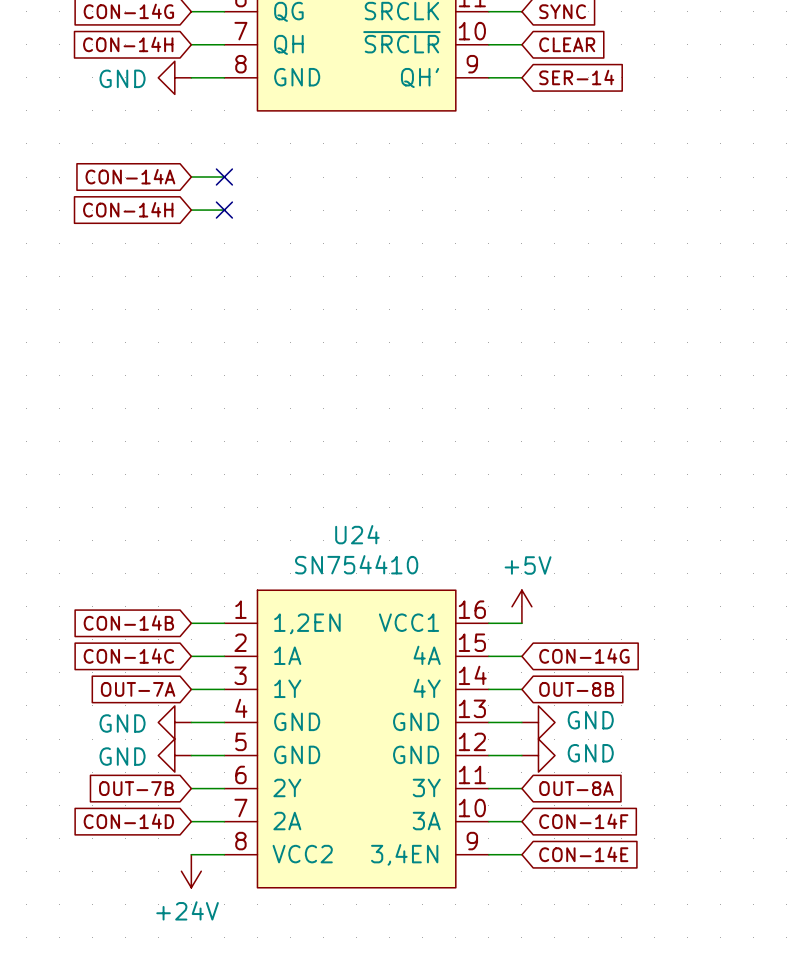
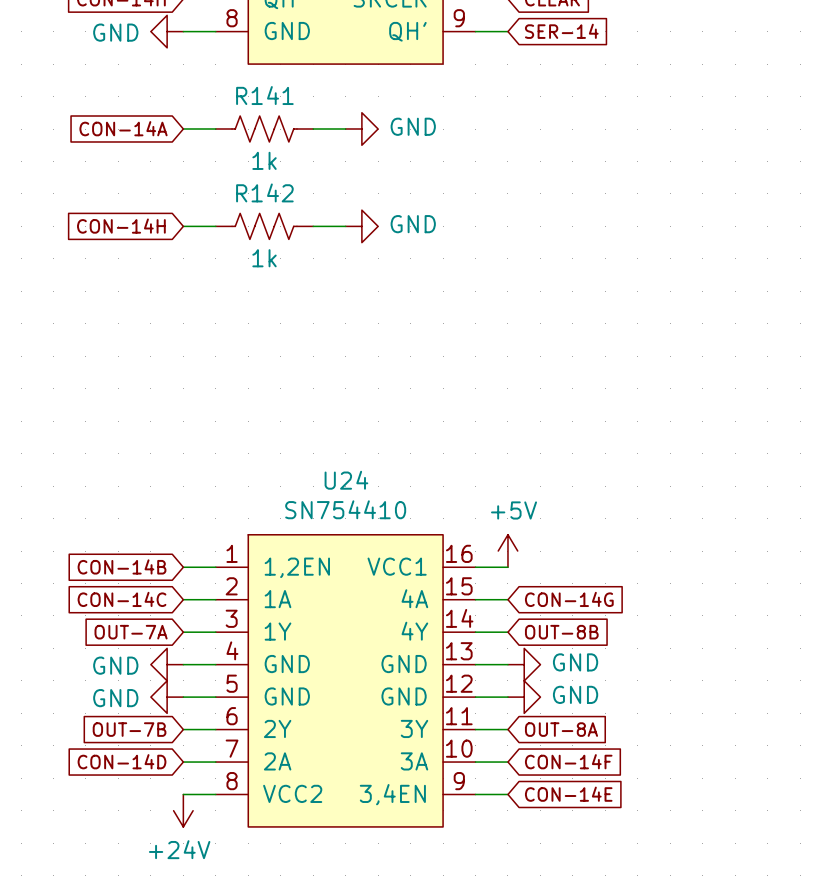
no-connect mark: (224, 177) -> none
R141: none -> 1k (264, 129)
wire: none -> (313, 129) (345, 129)
power symbol: none -> GND (361, 129)
global label position: CON-14H (128, 209) -> CON-14H (121, 226)
wire: (191, 210) (224, 210) -> (183, 226) (215, 226)
no-connect mark: (224, 210) -> none
R142: none -> 1k (264, 226)
wire: none -> (313, 226) (345, 226)
power symbol: none -> GND (361, 226)

